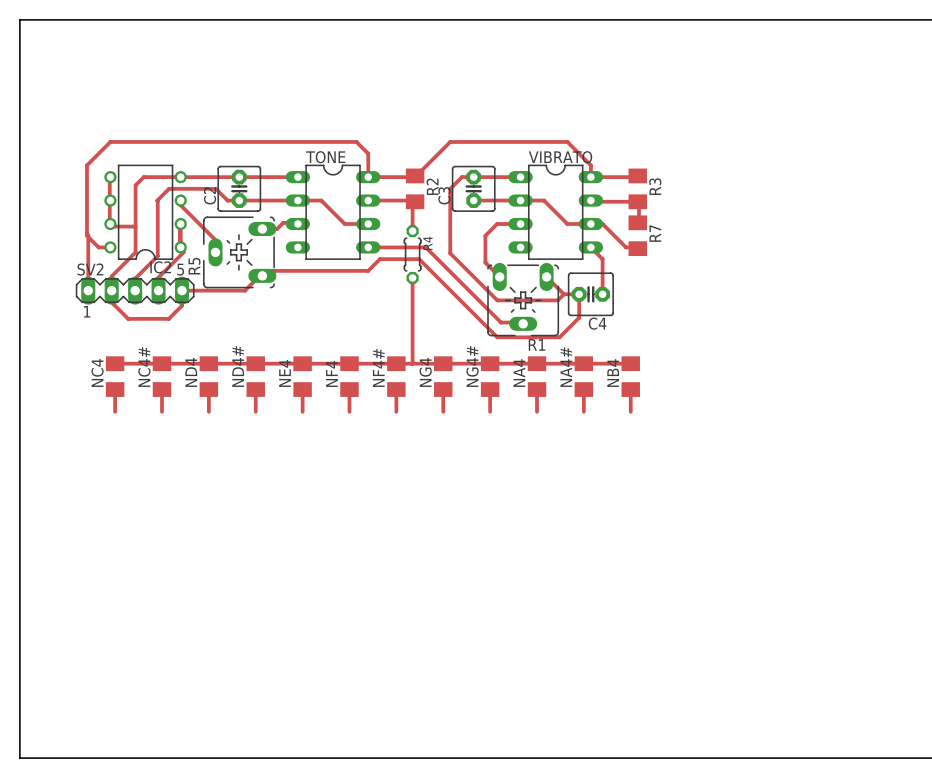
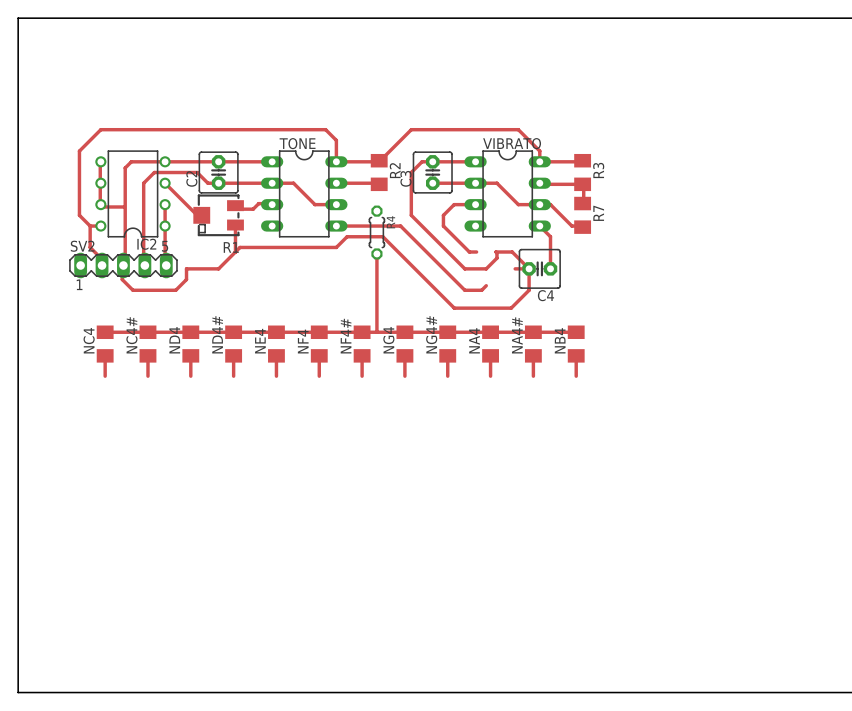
top track: (137, 183) (135, 252) (111, 276) (113, 304) (128, 318) (168, 318) (182, 305) (182, 290) (245, 290) (264, 270) -> (125, 167) (125, 275)
top track: (157, 200) (157, 256) (135, 278) (135, 290) -> (143, 183) (143, 268)
top track: (180, 200) (180, 205) (216, 241) (215, 252) -> (165, 183) (197, 215) (201, 215)
top track: (415, 201) (412, 204) (412, 231) -> none
top track: (180, 224) (179, 241) (183, 245) (183, 252) (158, 277) (158, 290) -> none
top track: (86, 233) (88, 290) -> none
top track: (450, 235) (450, 253) (497, 300) (557, 300) (563, 294) (546, 276) -> (411, 215) (464, 268) (486, 268) (496, 258) (495, 252) (512, 252) (529, 268)
top track: none -> (235, 225) (235, 252)
top track: none -> (90, 226) (90, 247) (100, 258) (100, 268)
top track: none -> (165, 226) (165, 268)
top track: (425, 247) (501, 322) (523, 323) -> (389, 226) (400, 226) (464, 290) (481, 290) (486, 285)
top track: (485, 247) (485, 262) (499, 276) -> (443, 226) (469, 252) (476, 252)
R5: (239, 252) -> none
R1 footprint: [487, 262, 560, 337] -> [193, 194, 244, 237]
top track: none -> (240, 247) (218, 268) (186, 268) (186, 279) (175, 290) (132, 290) (122, 279) (122, 268)

